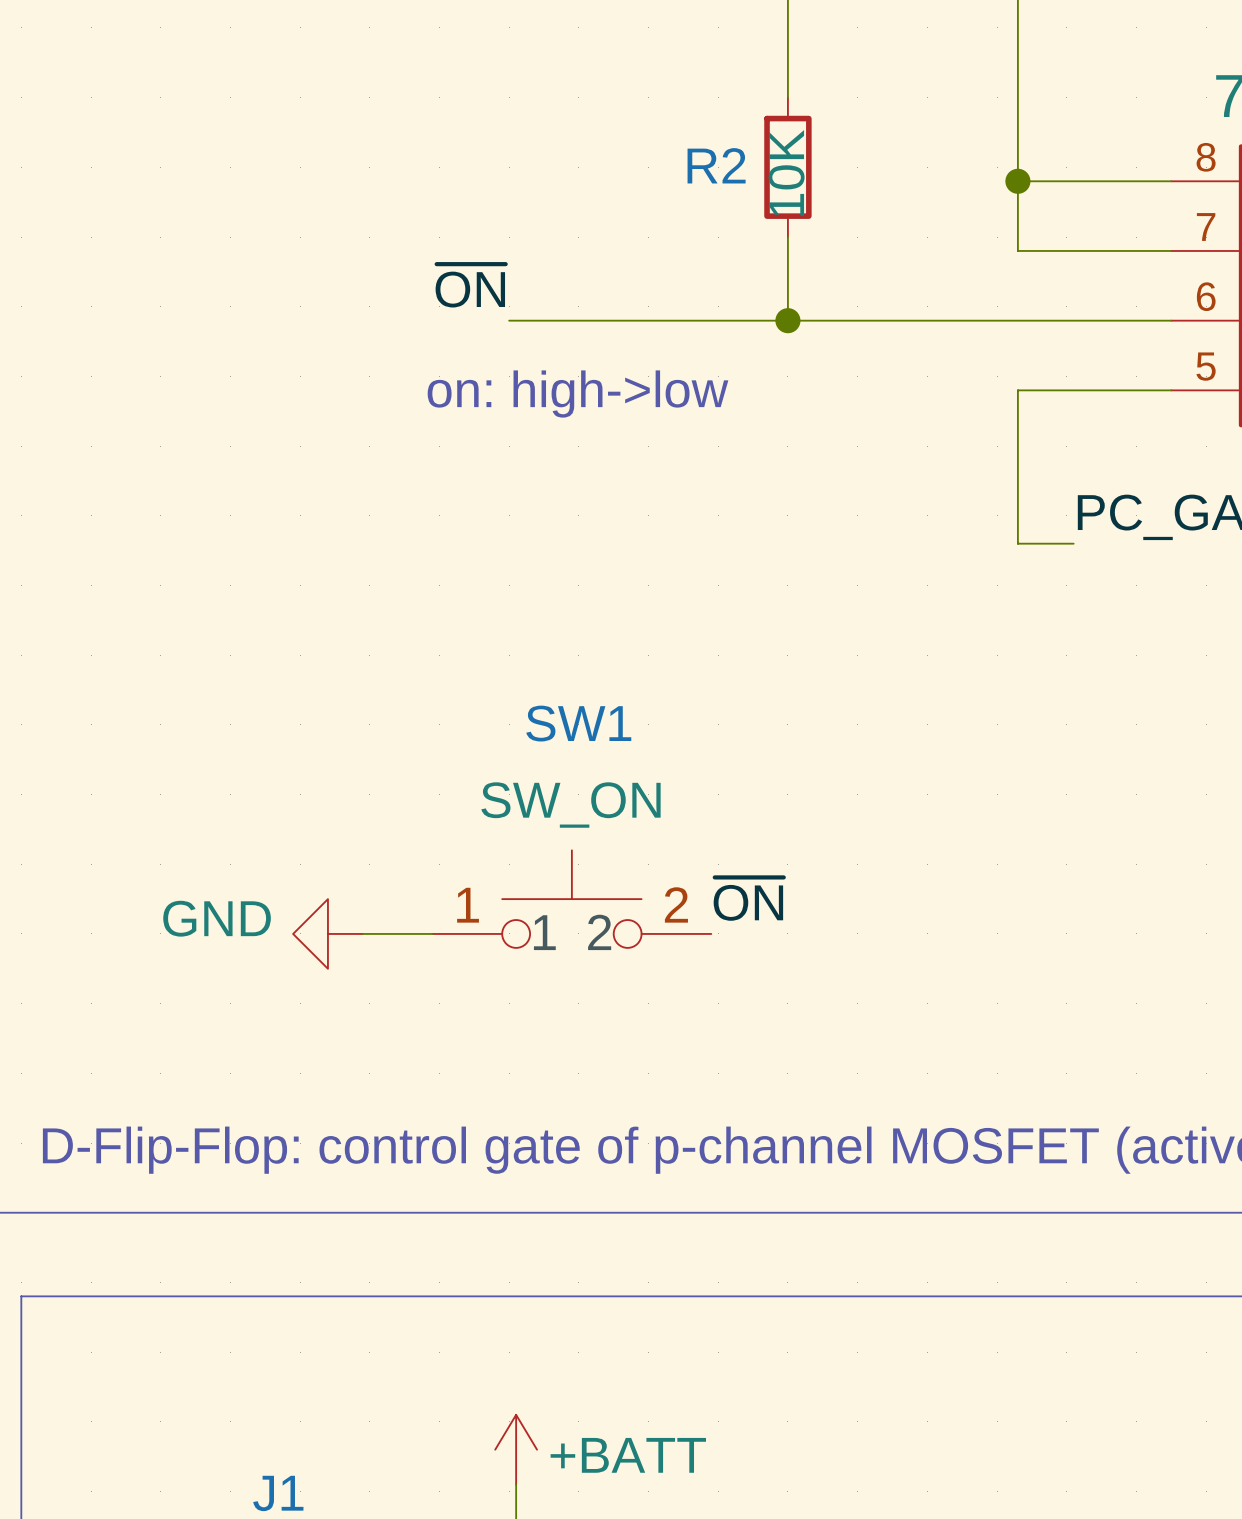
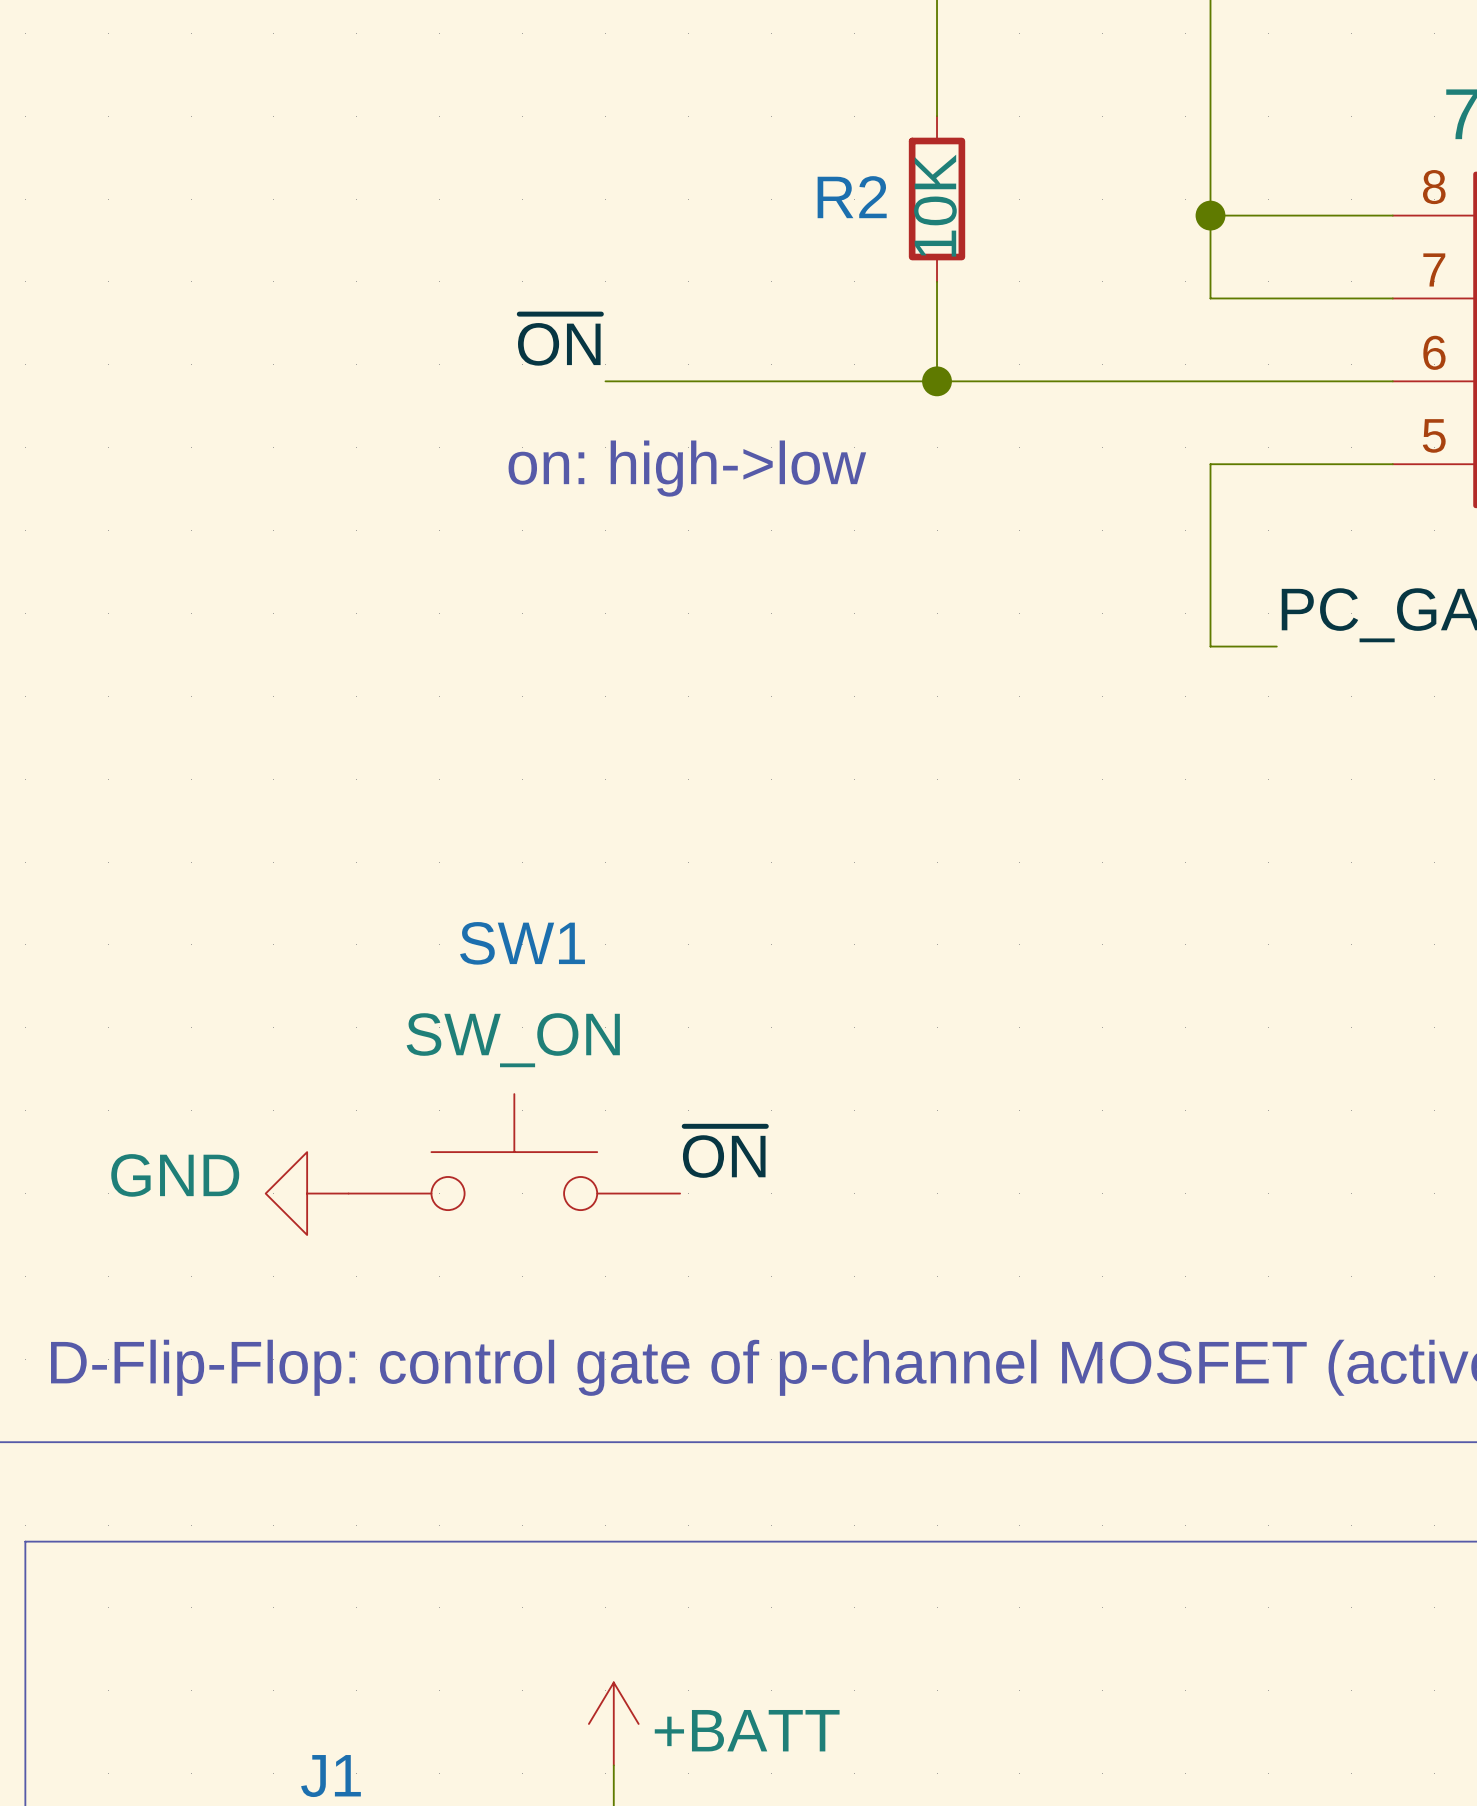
SW1 position: (571, 899) -> (514, 1152)
label position: ~{ON} (748, 899) -> ~{ON} (724, 1152)
SW1 pin number: 2 (676, 904) -> none
SW1 pin number: 1 (468, 905) -> none
SW1 pin name: 1 (544, 932) -> none
SW1 pin name: 2 (599, 932) -> none
power symbol position: GND (327, 933) -> GND (307, 1193)
wire: (362, 933) (432, 933) -> none

